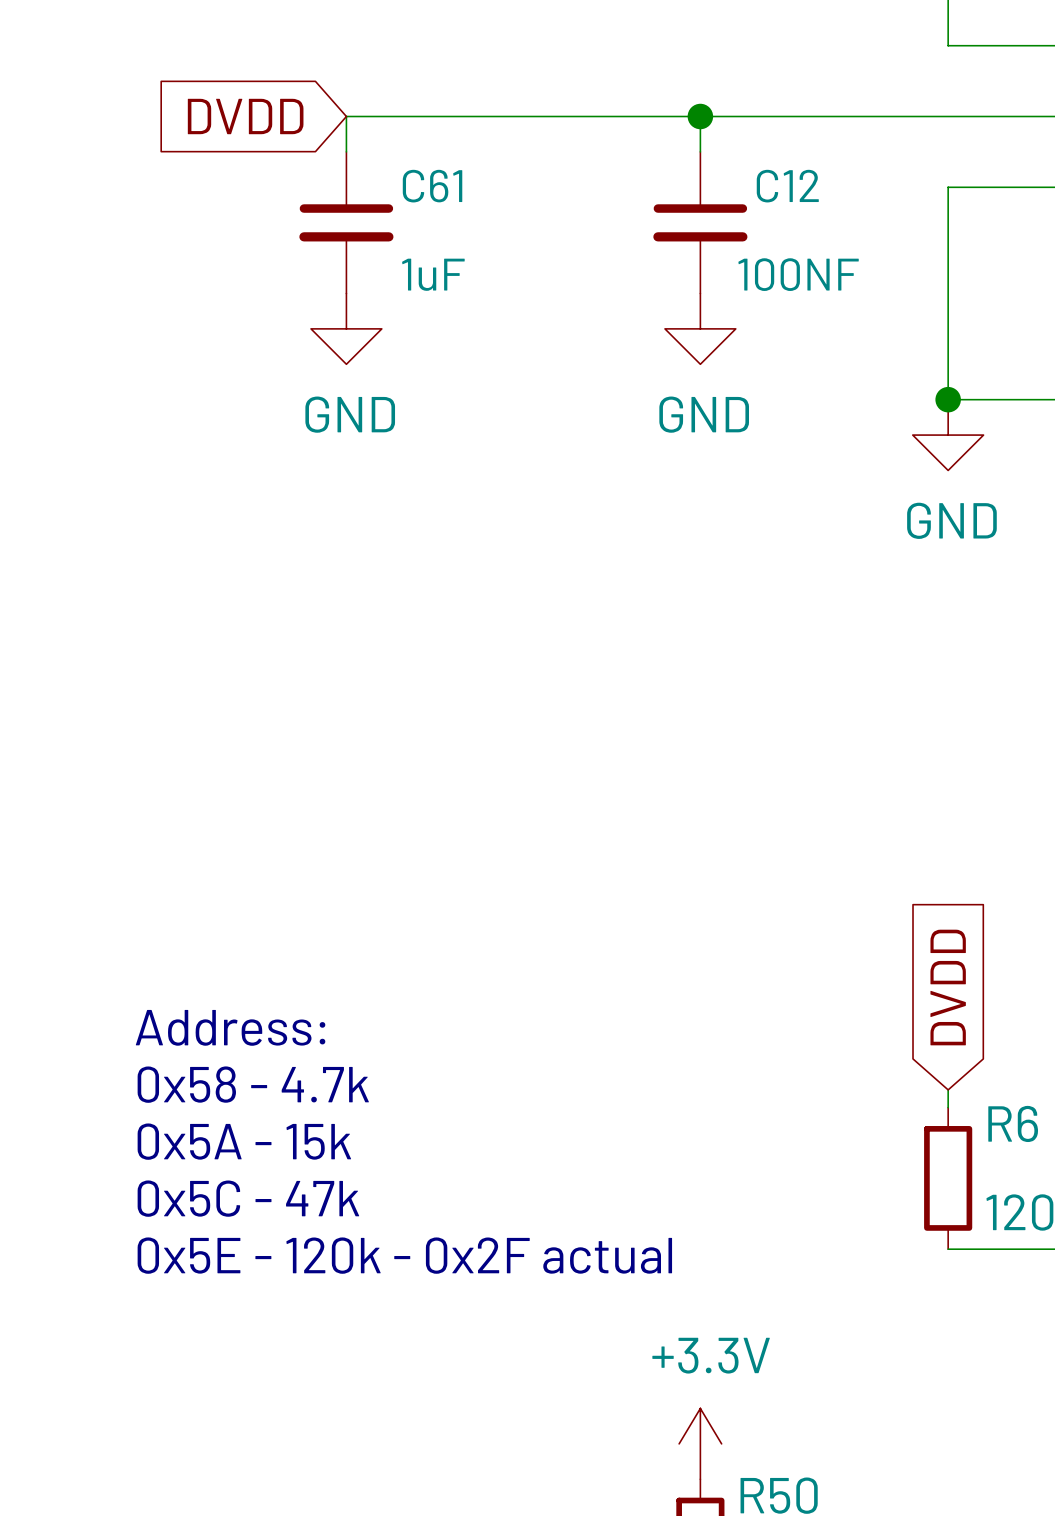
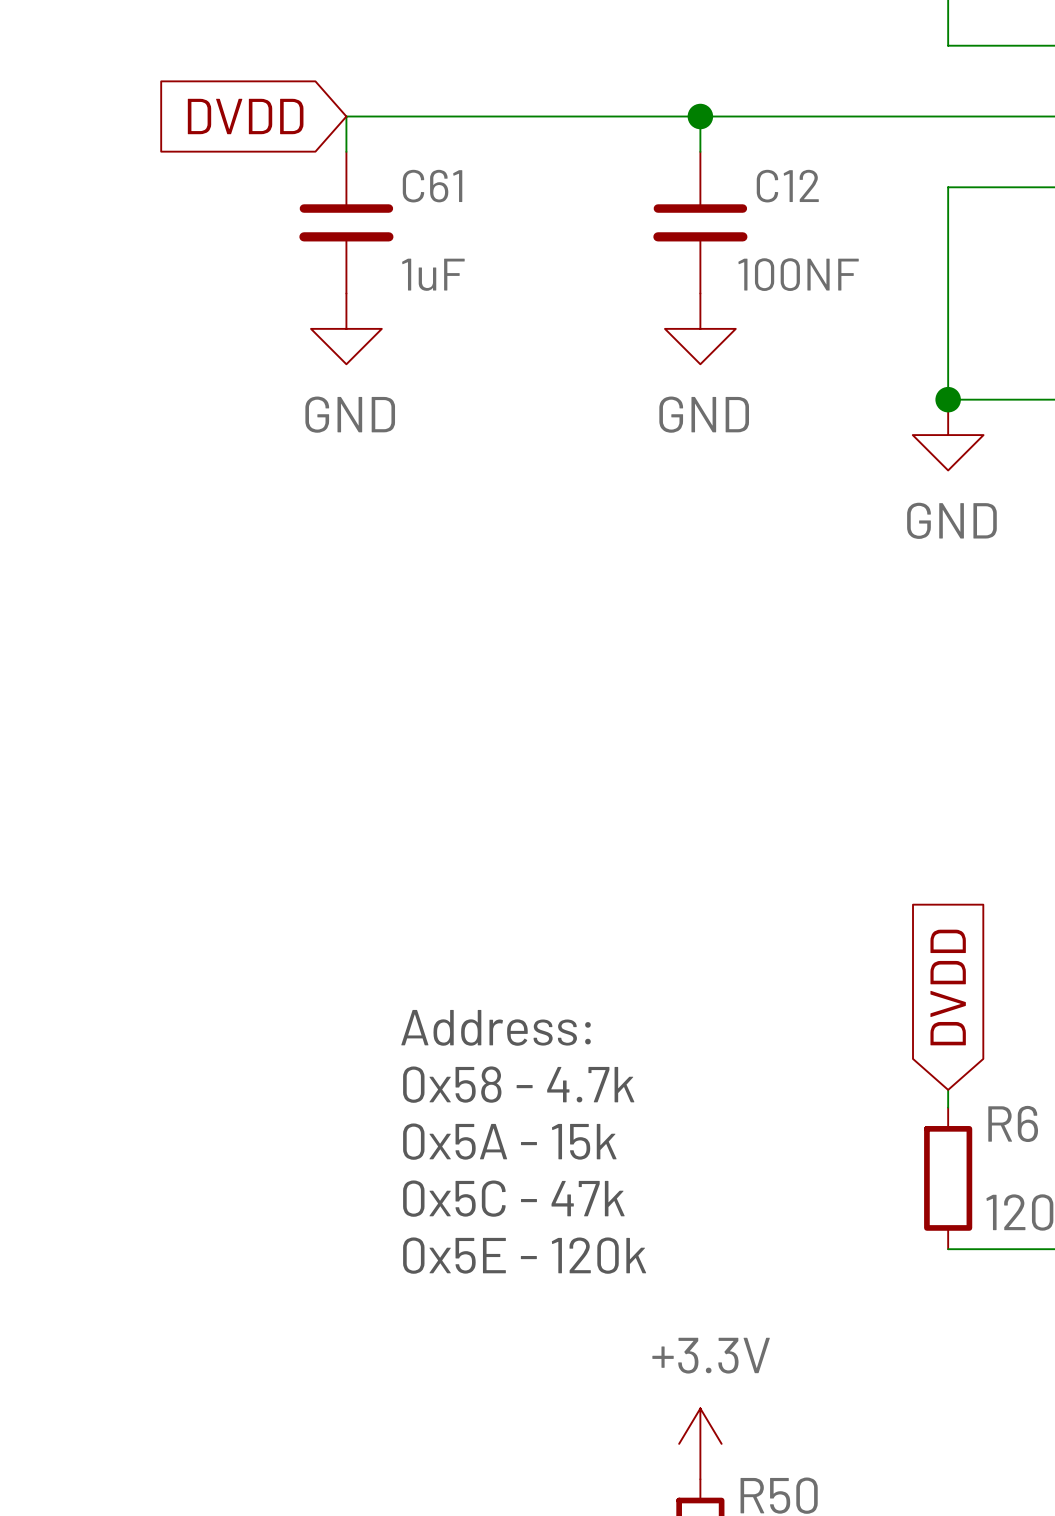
text position: Address: (230, 1027) -> Address: (495, 1027)
text position: 0x58 - 4.7k (253, 1084) -> 0x58 - 4.7k (518, 1084)
text position: 0x5A - 15k (244, 1141) -> 0x5A - 15k (509, 1141)
text position: 0x5C - 47k (248, 1198) -> 0x5C - 47k (513, 1198)
text: 0x5E - 120k - 0x2F actual (404, 1255) -> 0x5E - 120k (524, 1255)

